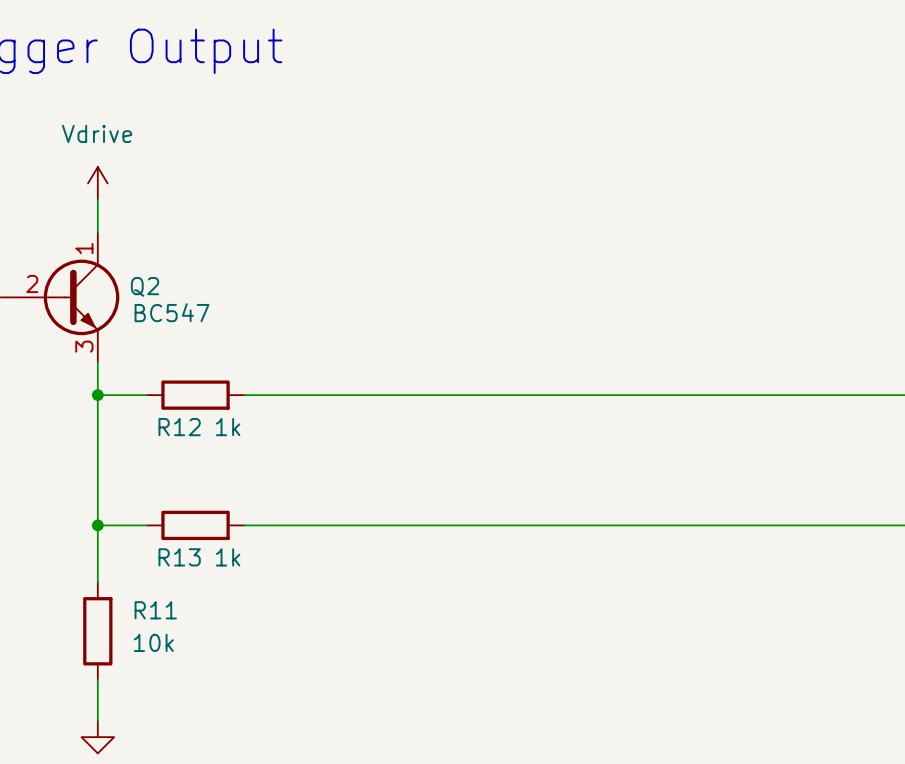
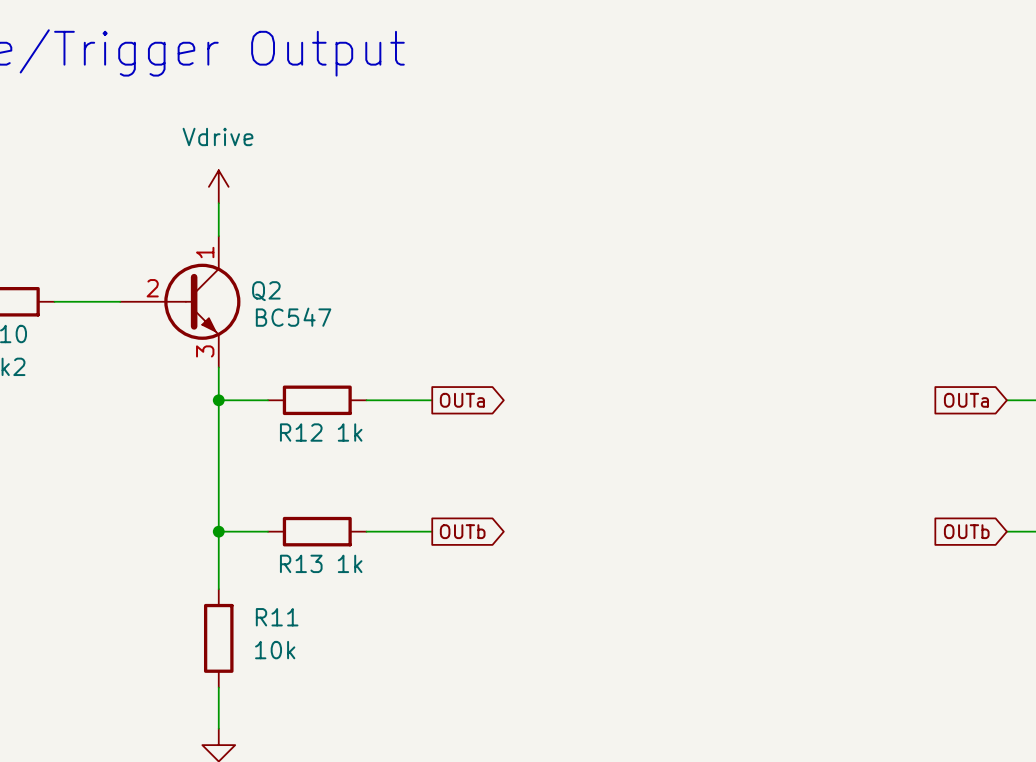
wire: (309, 395) (879, 395) -> none
global label: none -> OUTa (462, 400)
global label: none -> OUTa (966, 400)
wire: (309, 525) (879, 525) -> none
global label: none -> OUTb (462, 531)
global label: none -> OUTb (966, 531)

